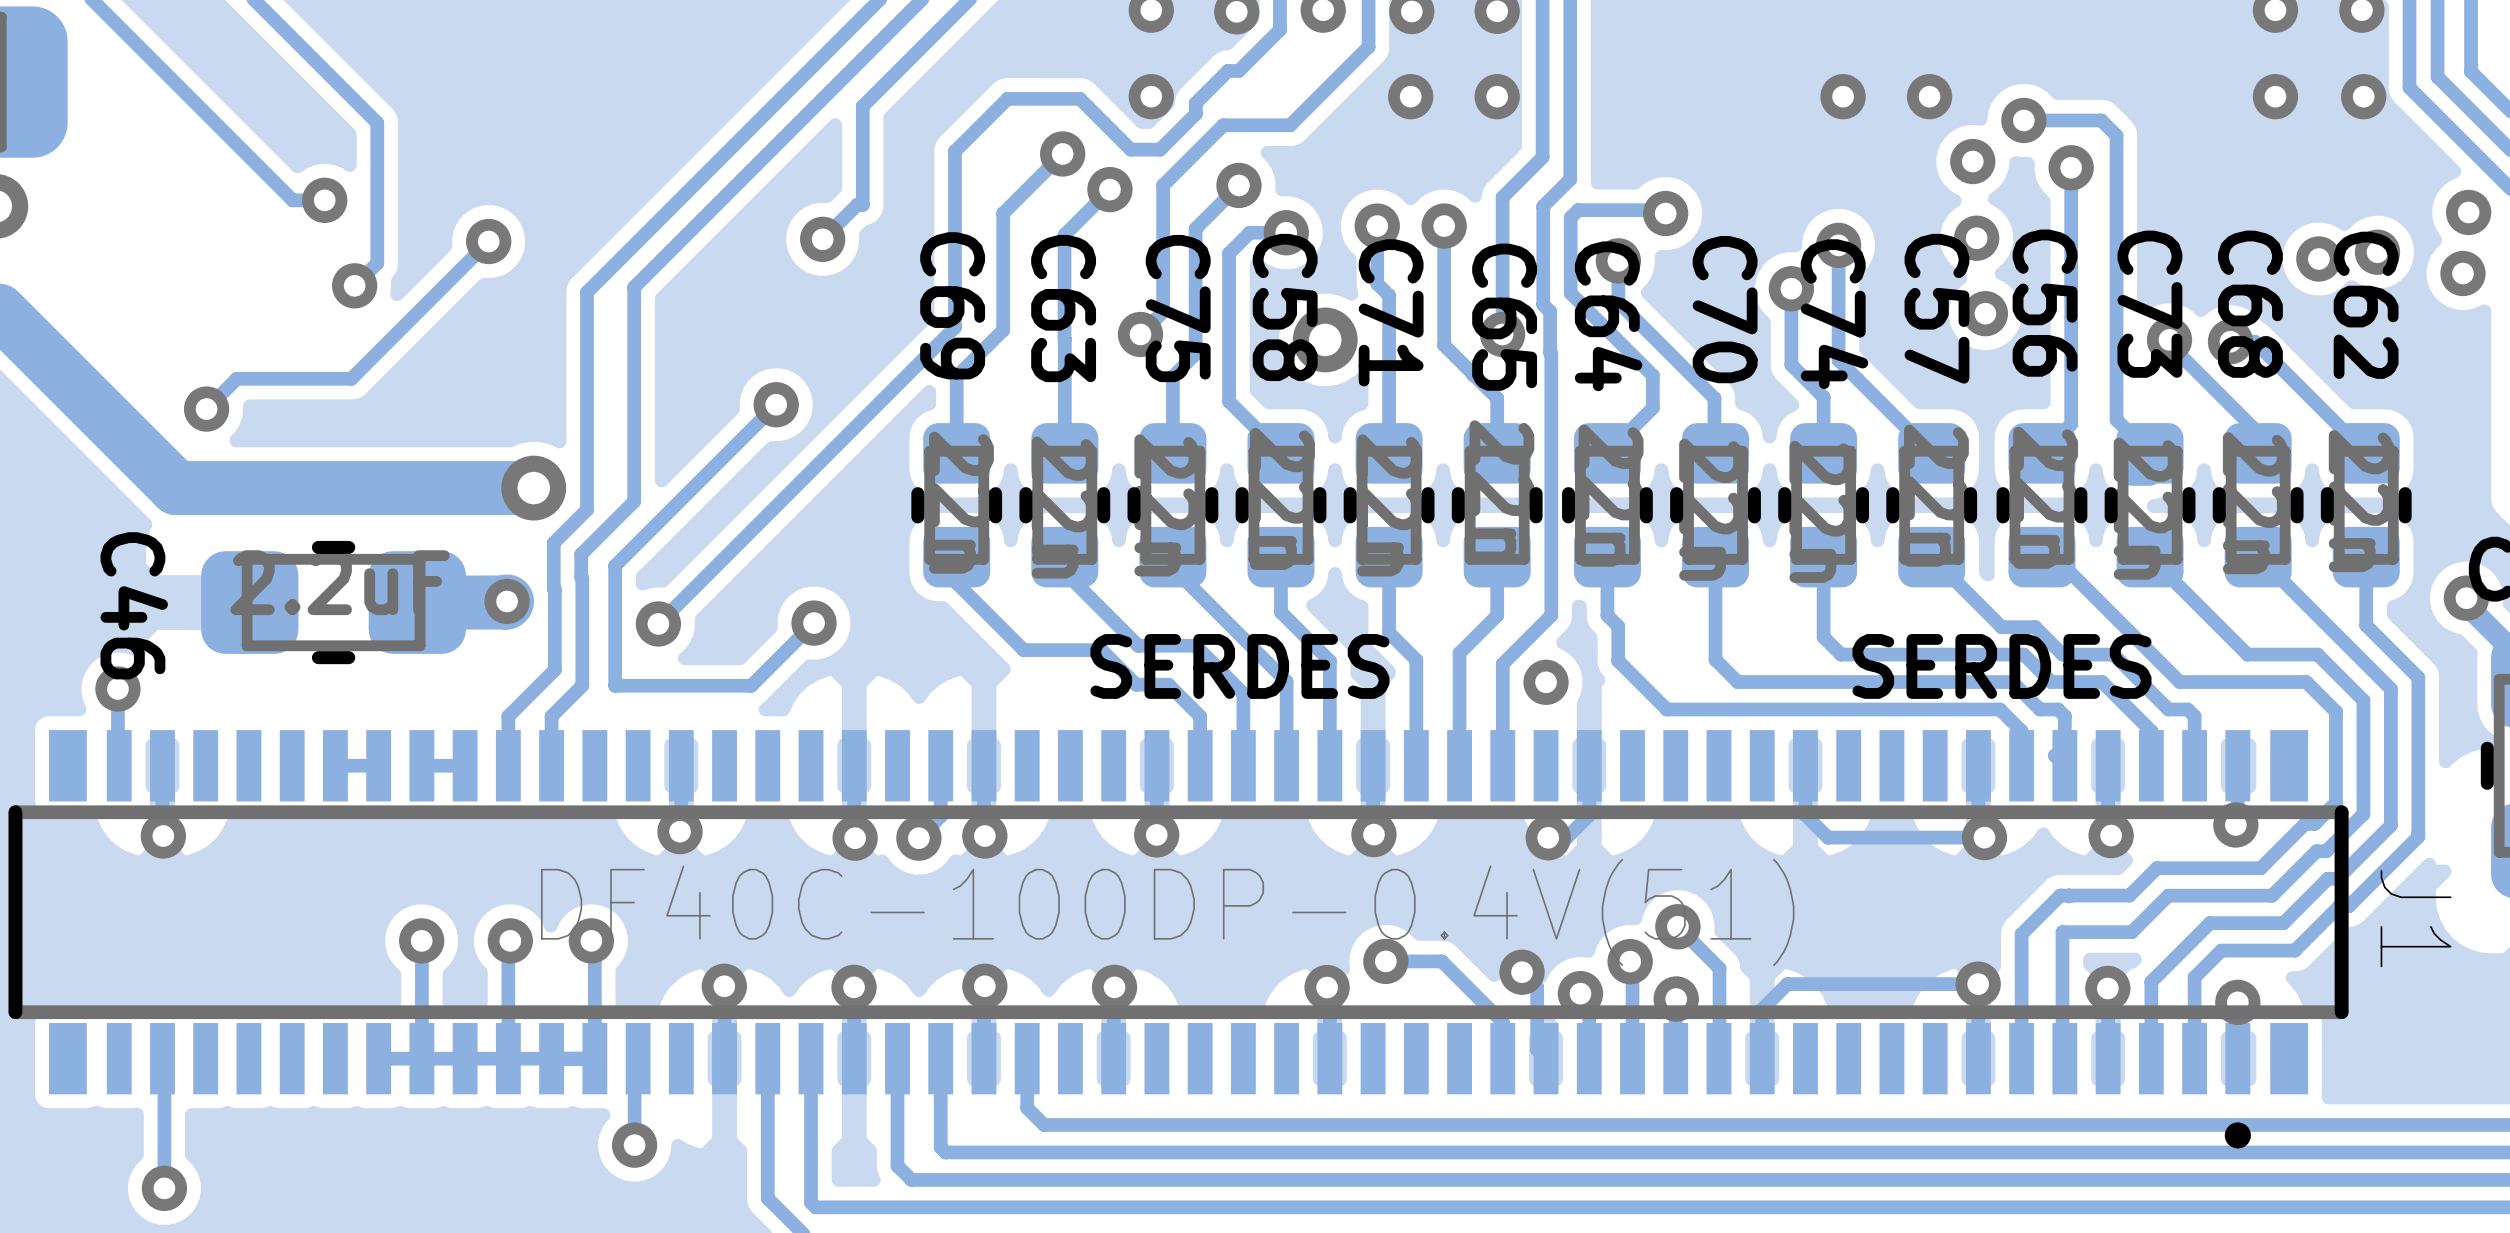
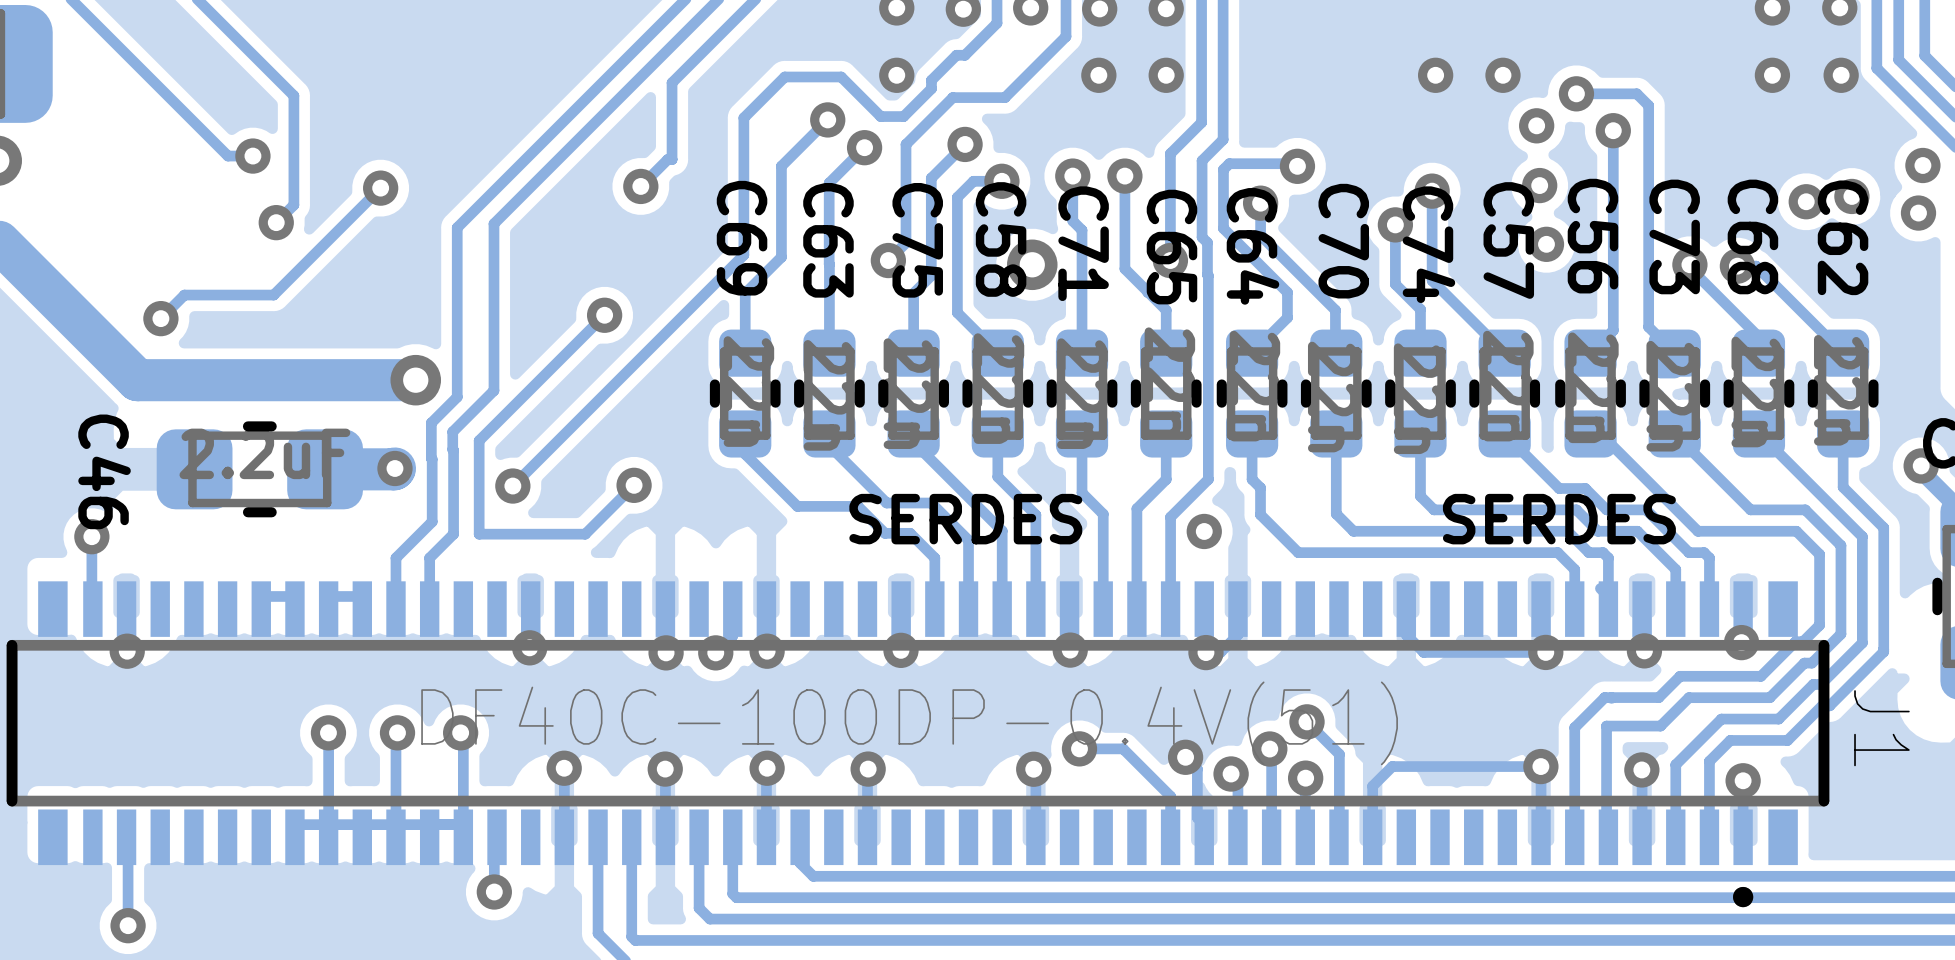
J1 position: (1178, 939) -> (918, 744)

